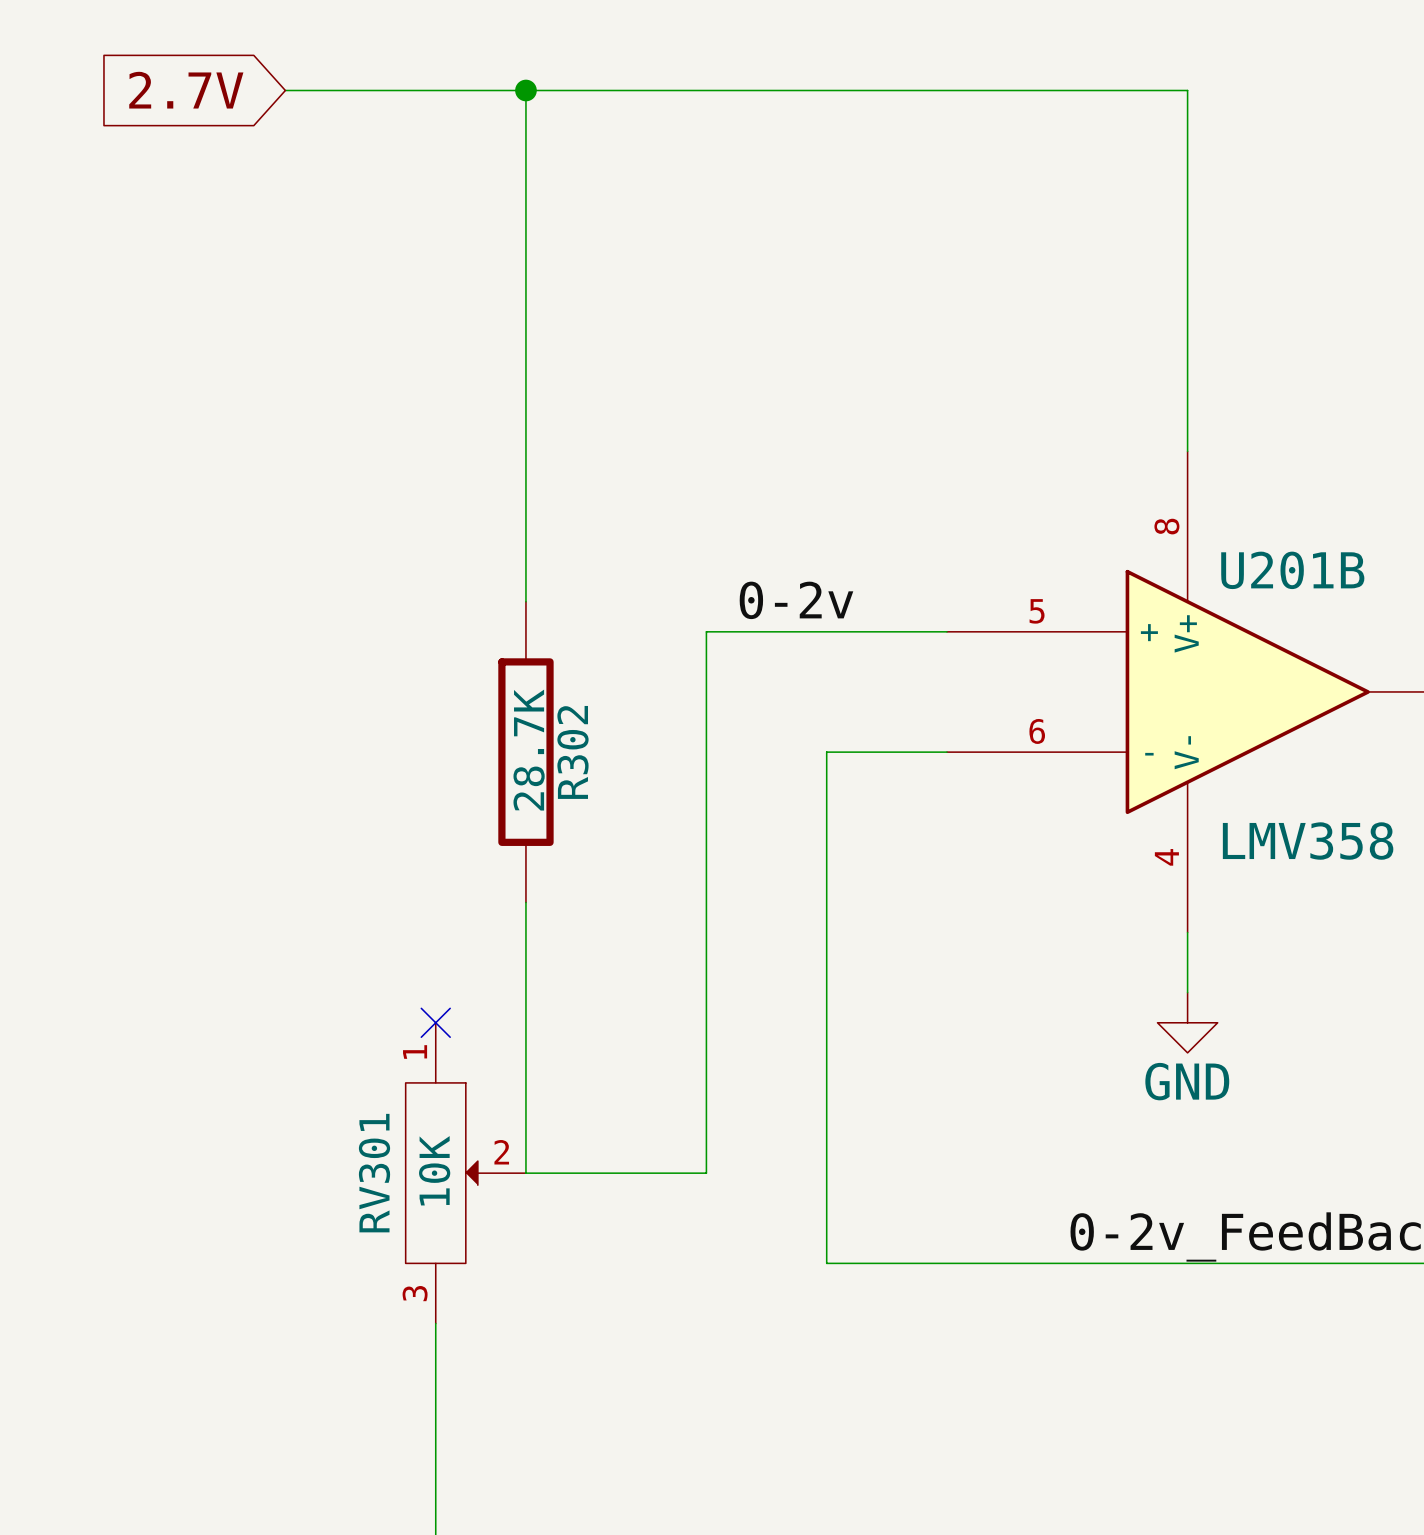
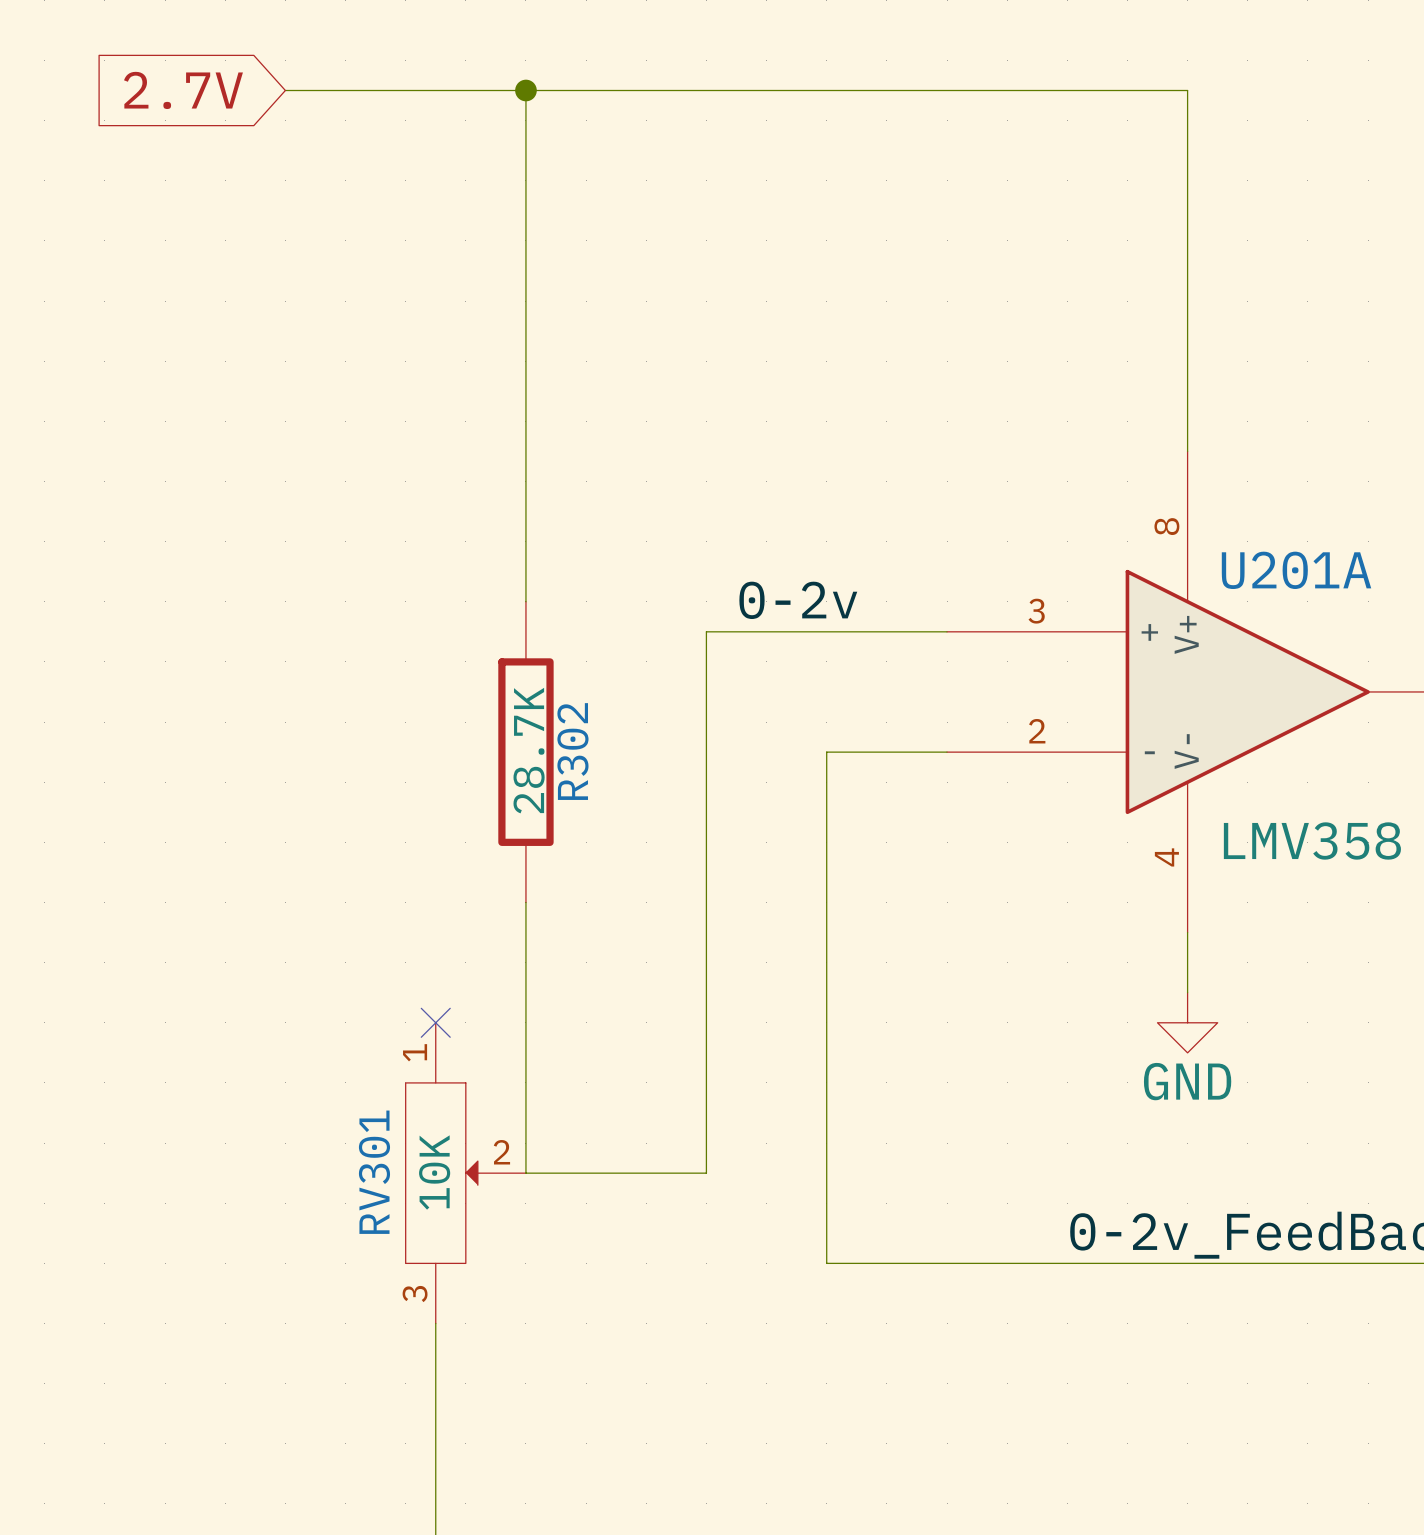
U201B name: U201B (1292, 570) -> U201A (1296, 570)
U201B pin number: 5 (1037, 611) -> 3 (1036, 611)
U201B pin number: 6 (1037, 731) -> 2 (1037, 731)

